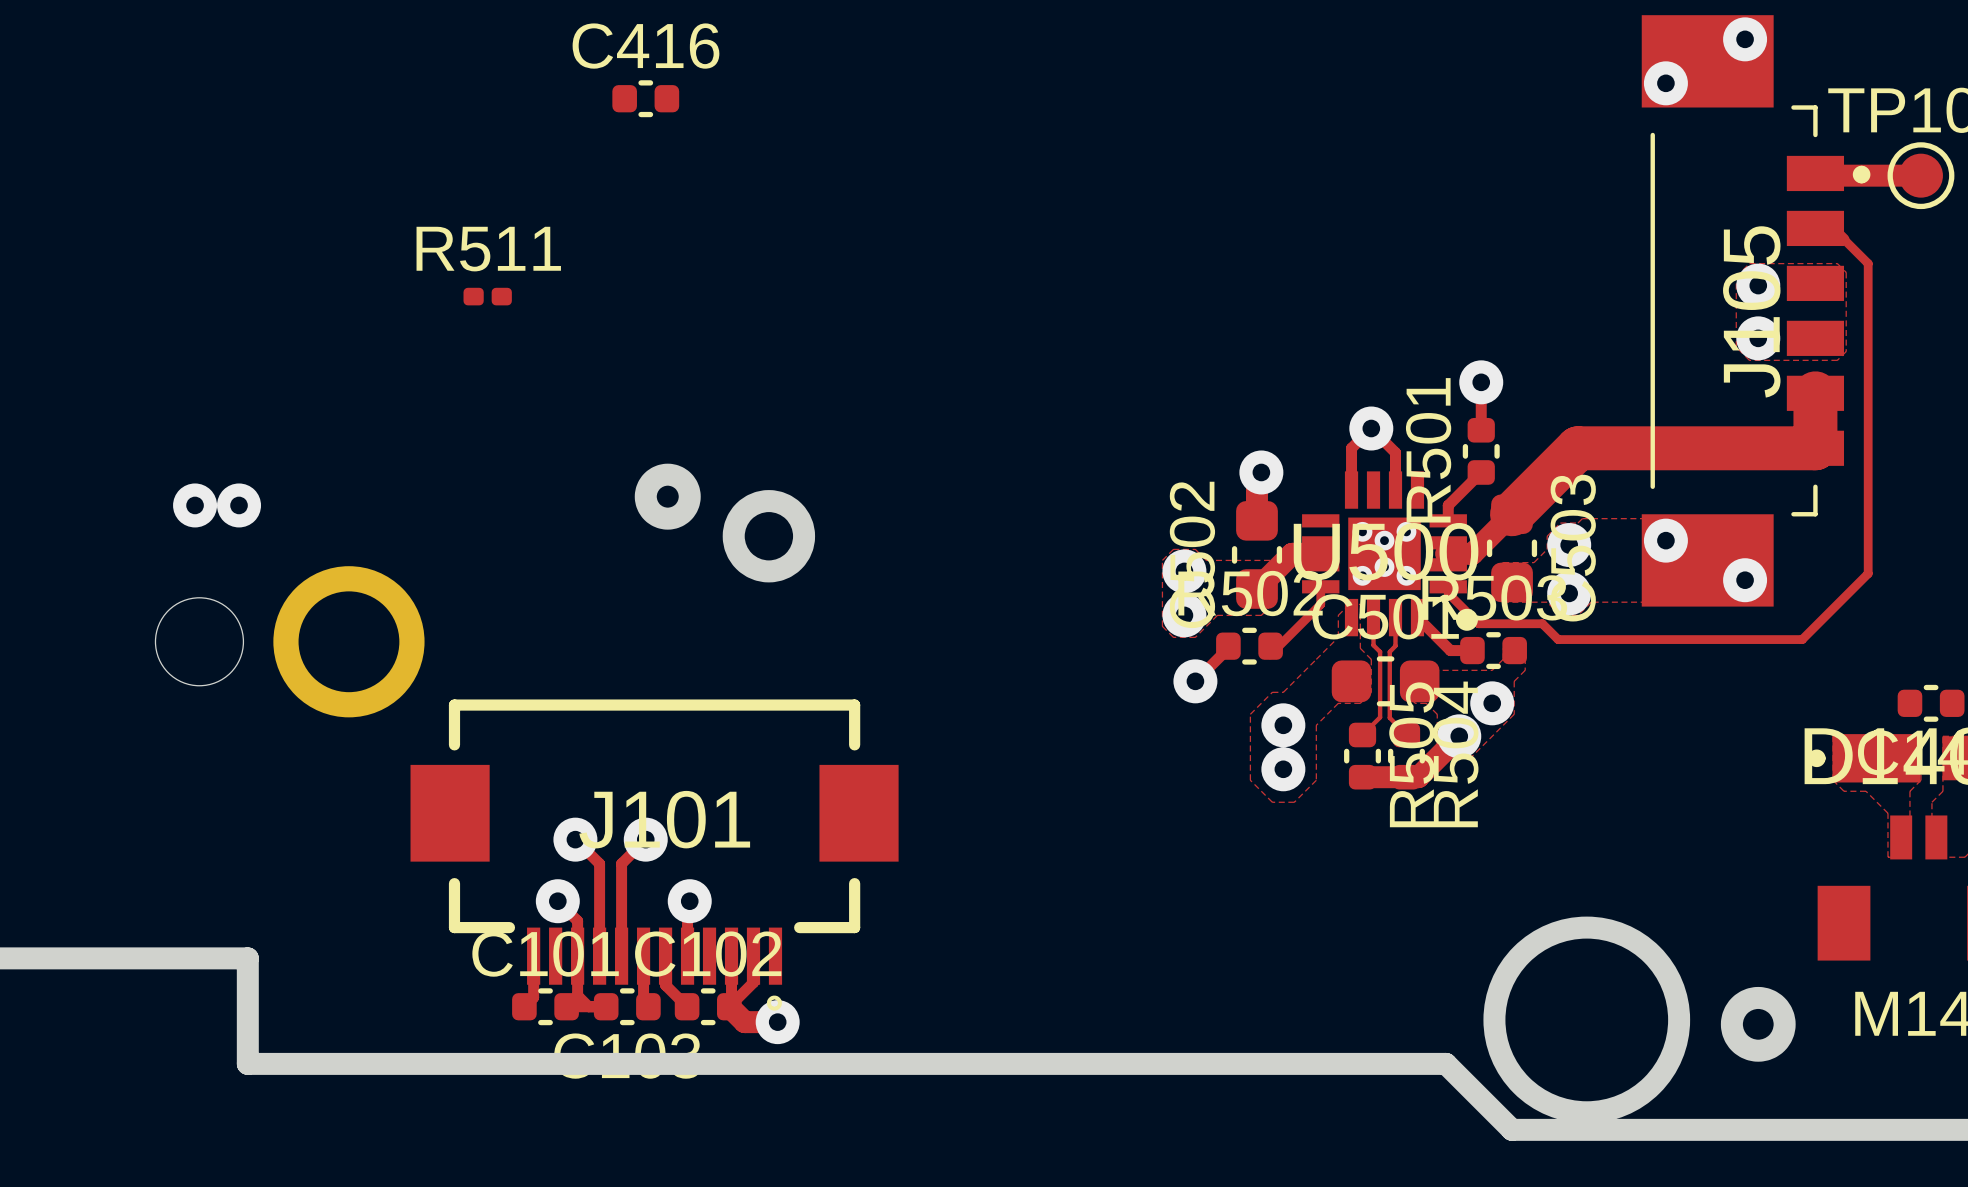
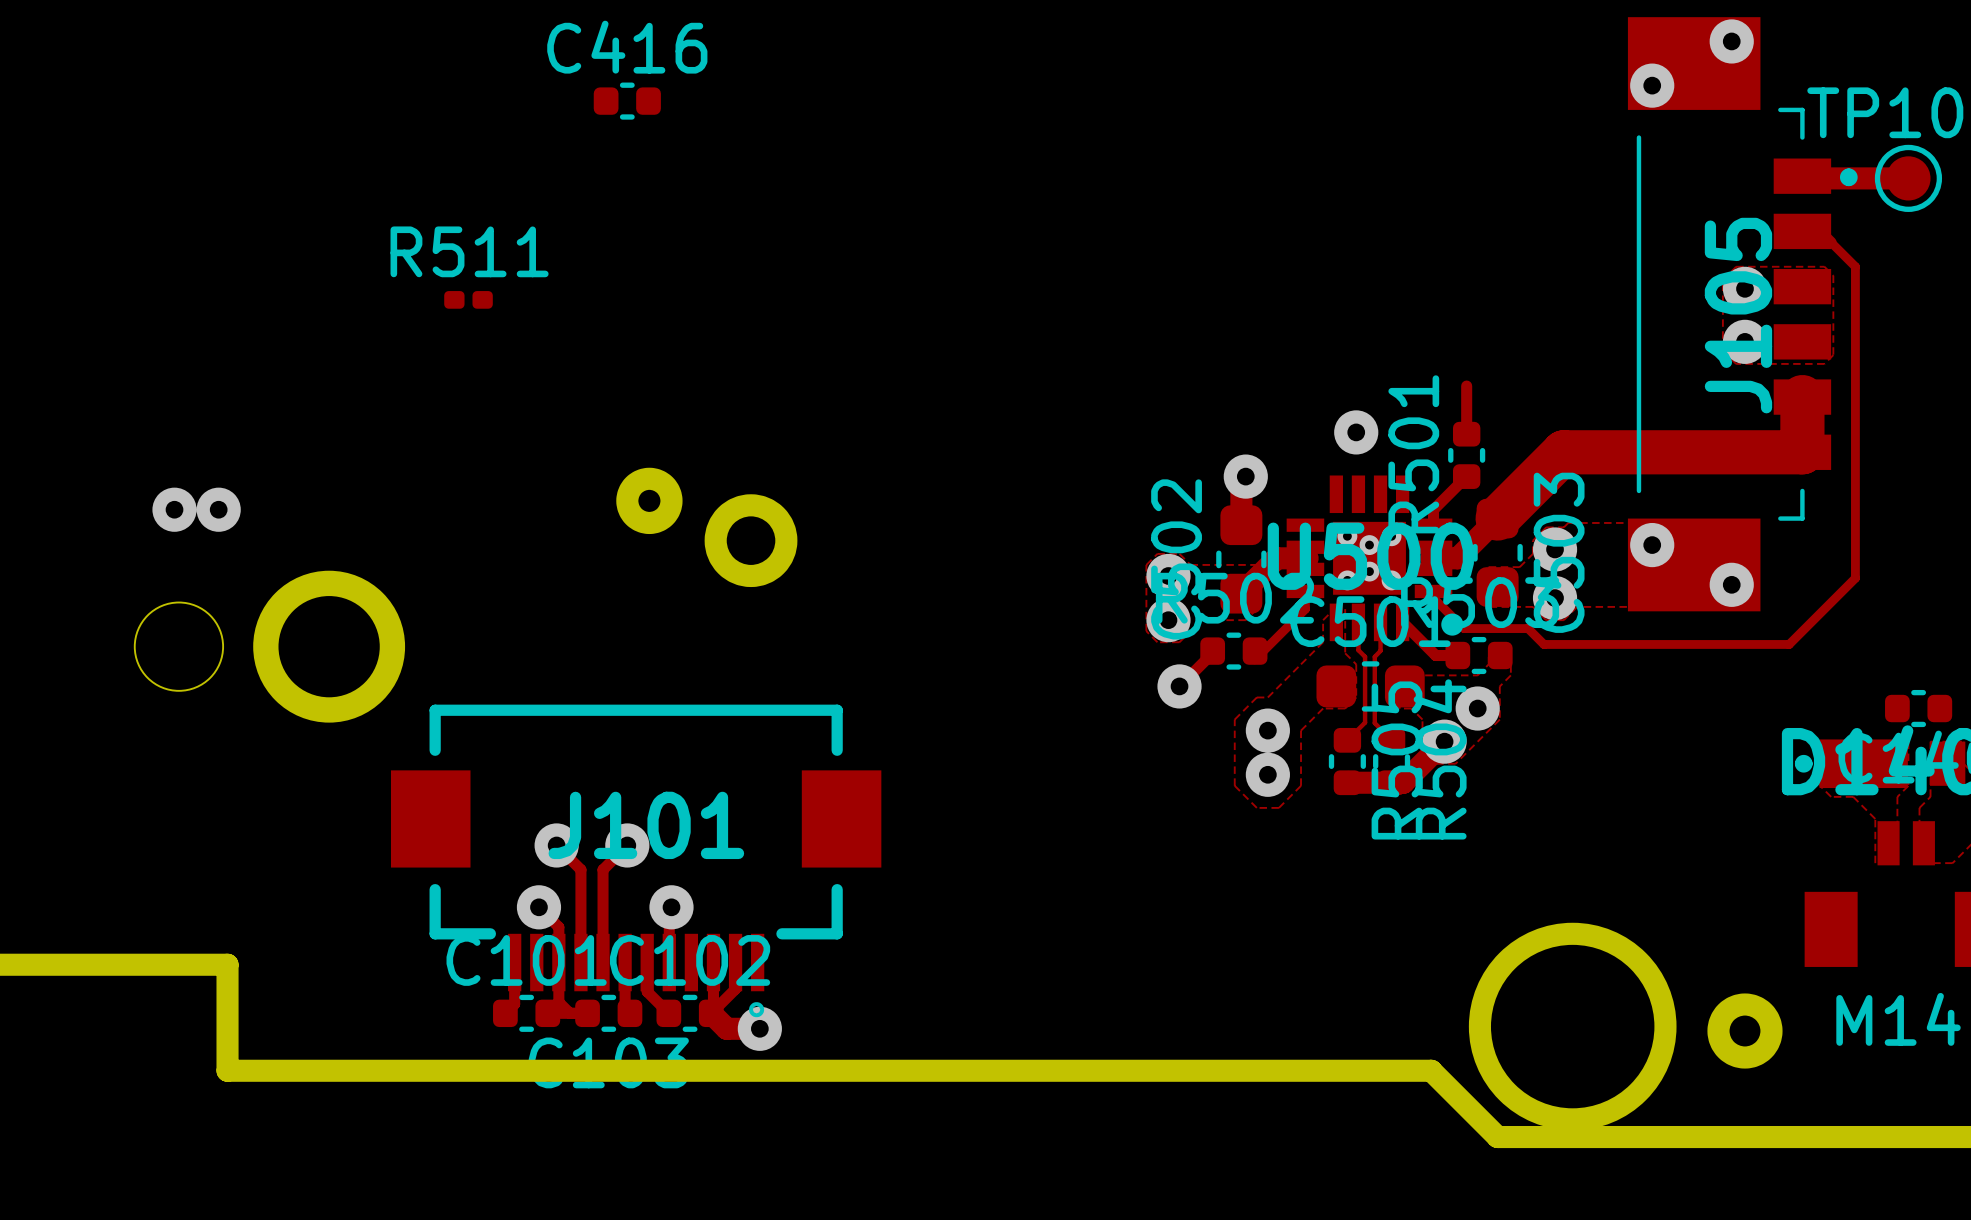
via: (1481, 382) -> none
track: (1351, 490) (1351, 448) (1371, 428) (1395, 452) (1395, 490) -> none

